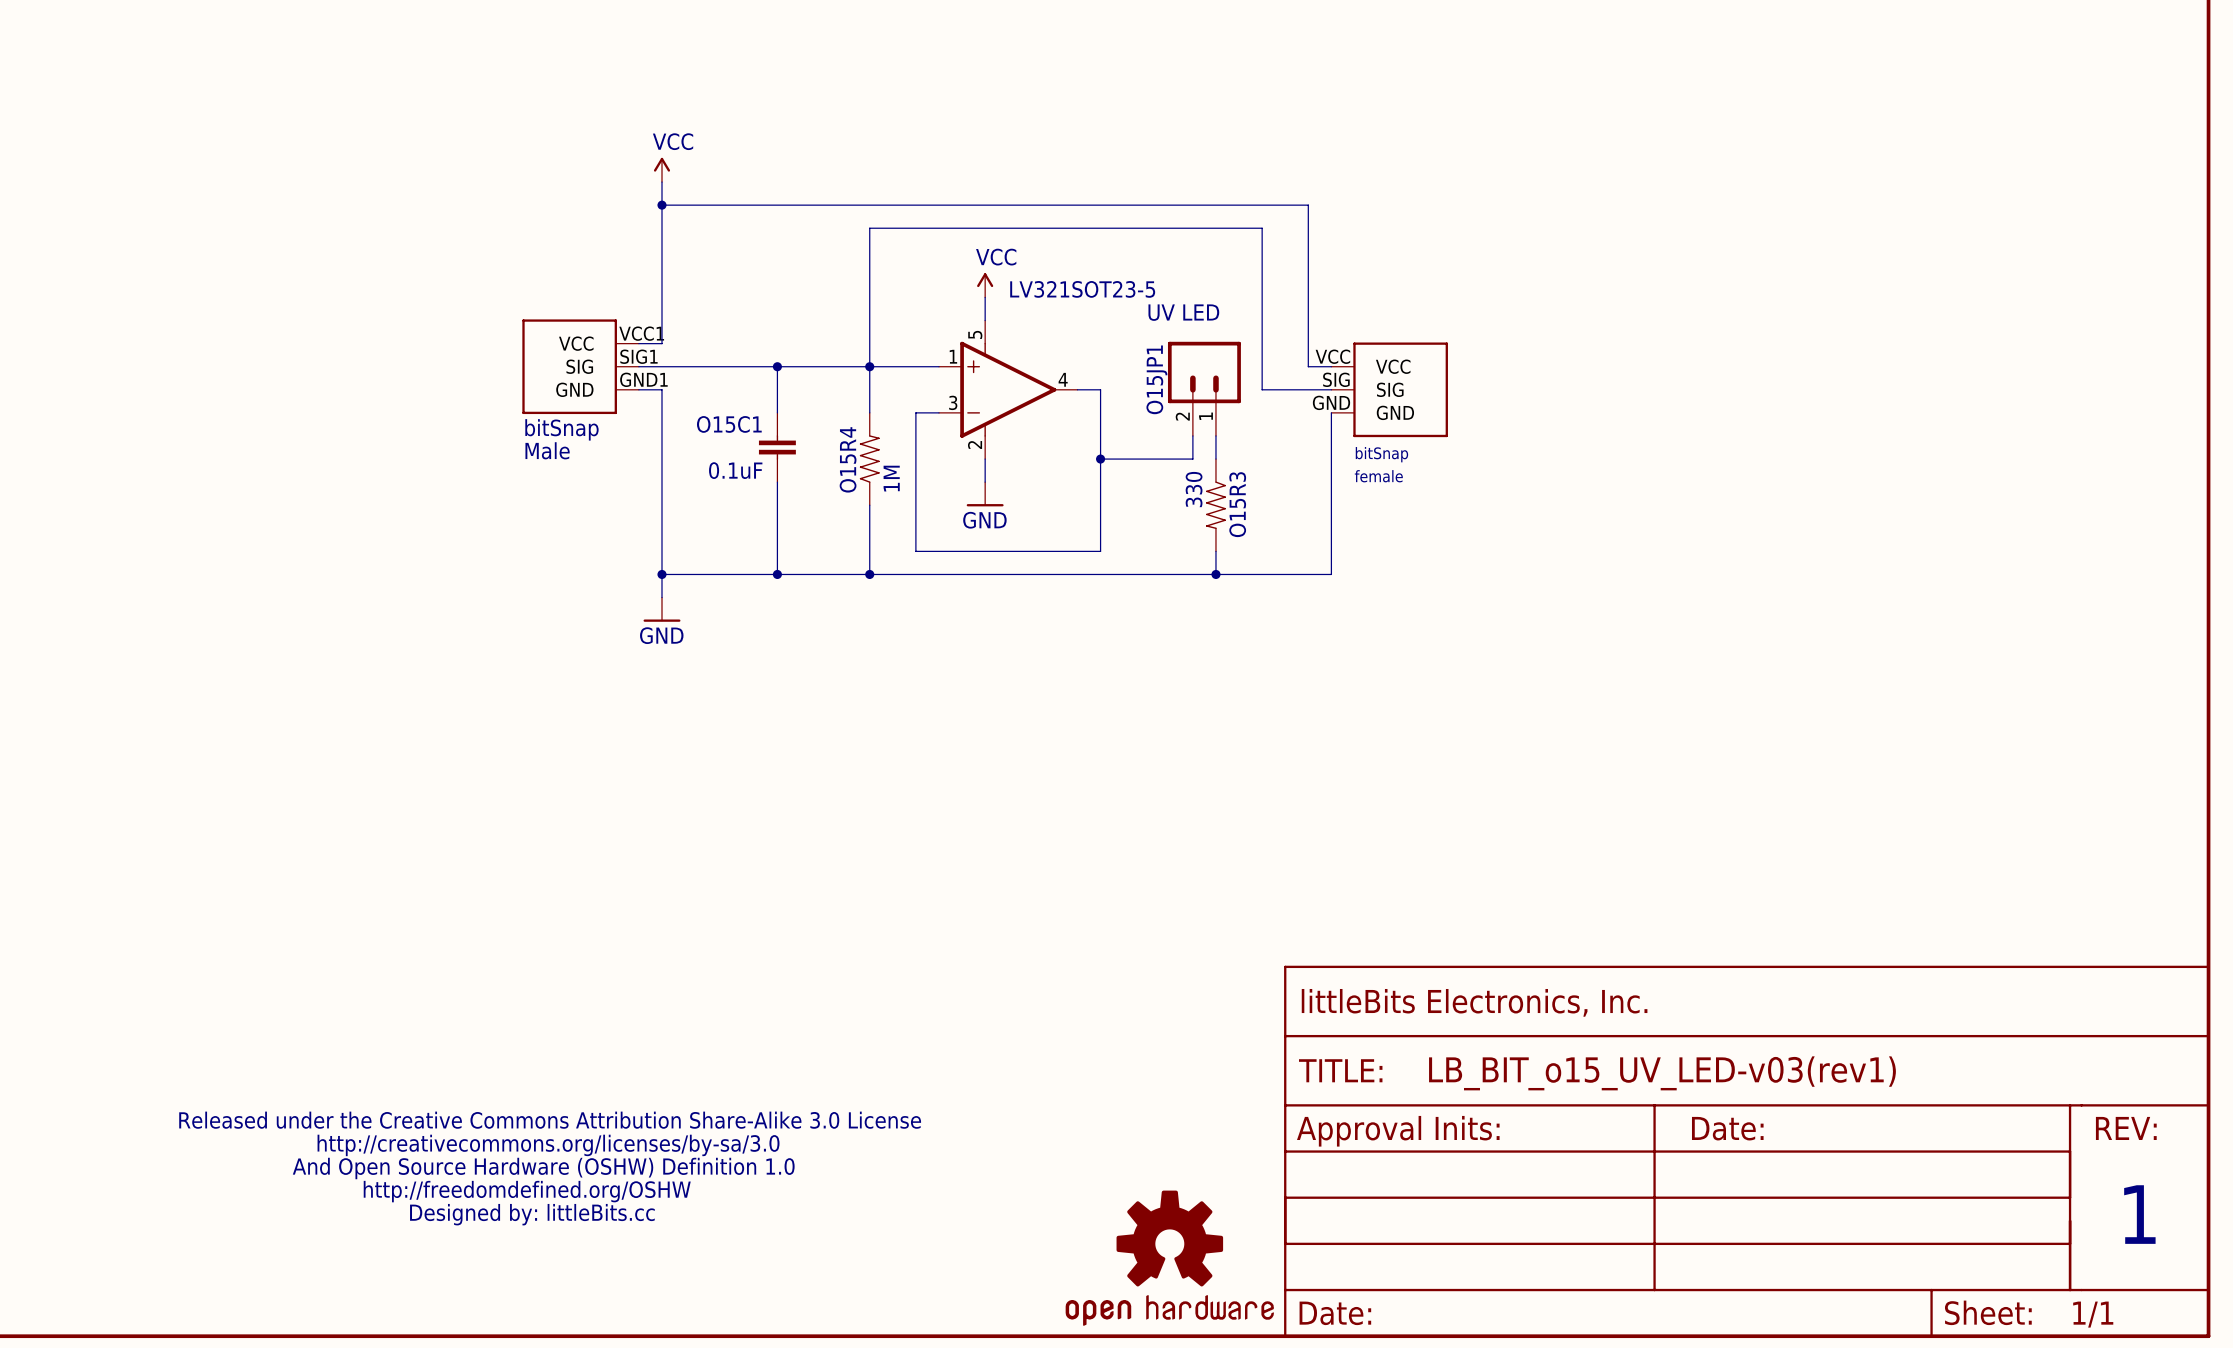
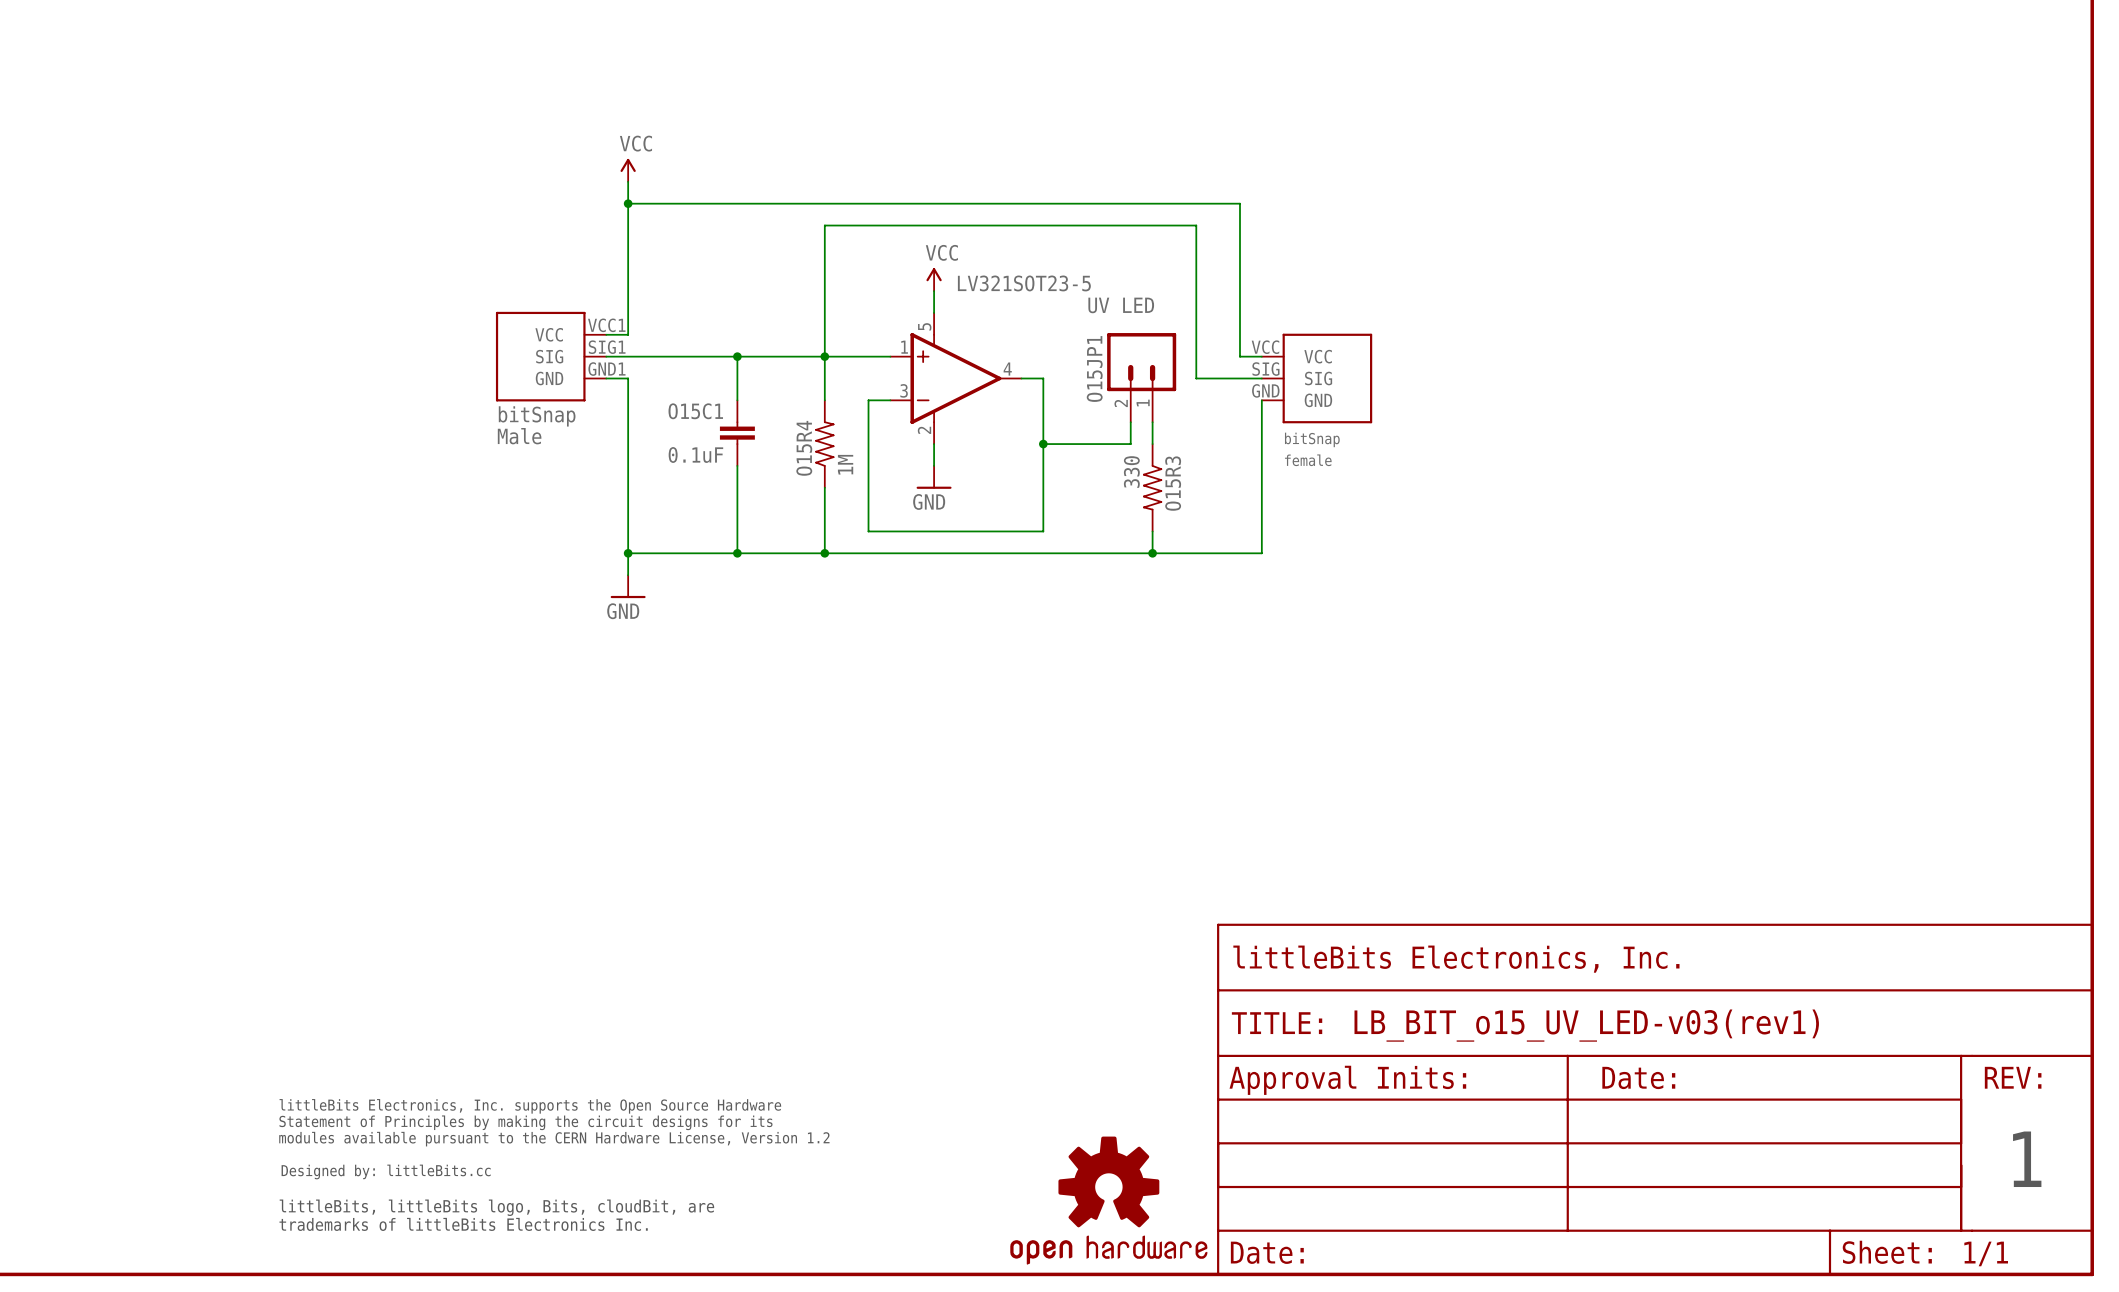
part: (550, 1168) -> none
part: none -> (554, 1165)

